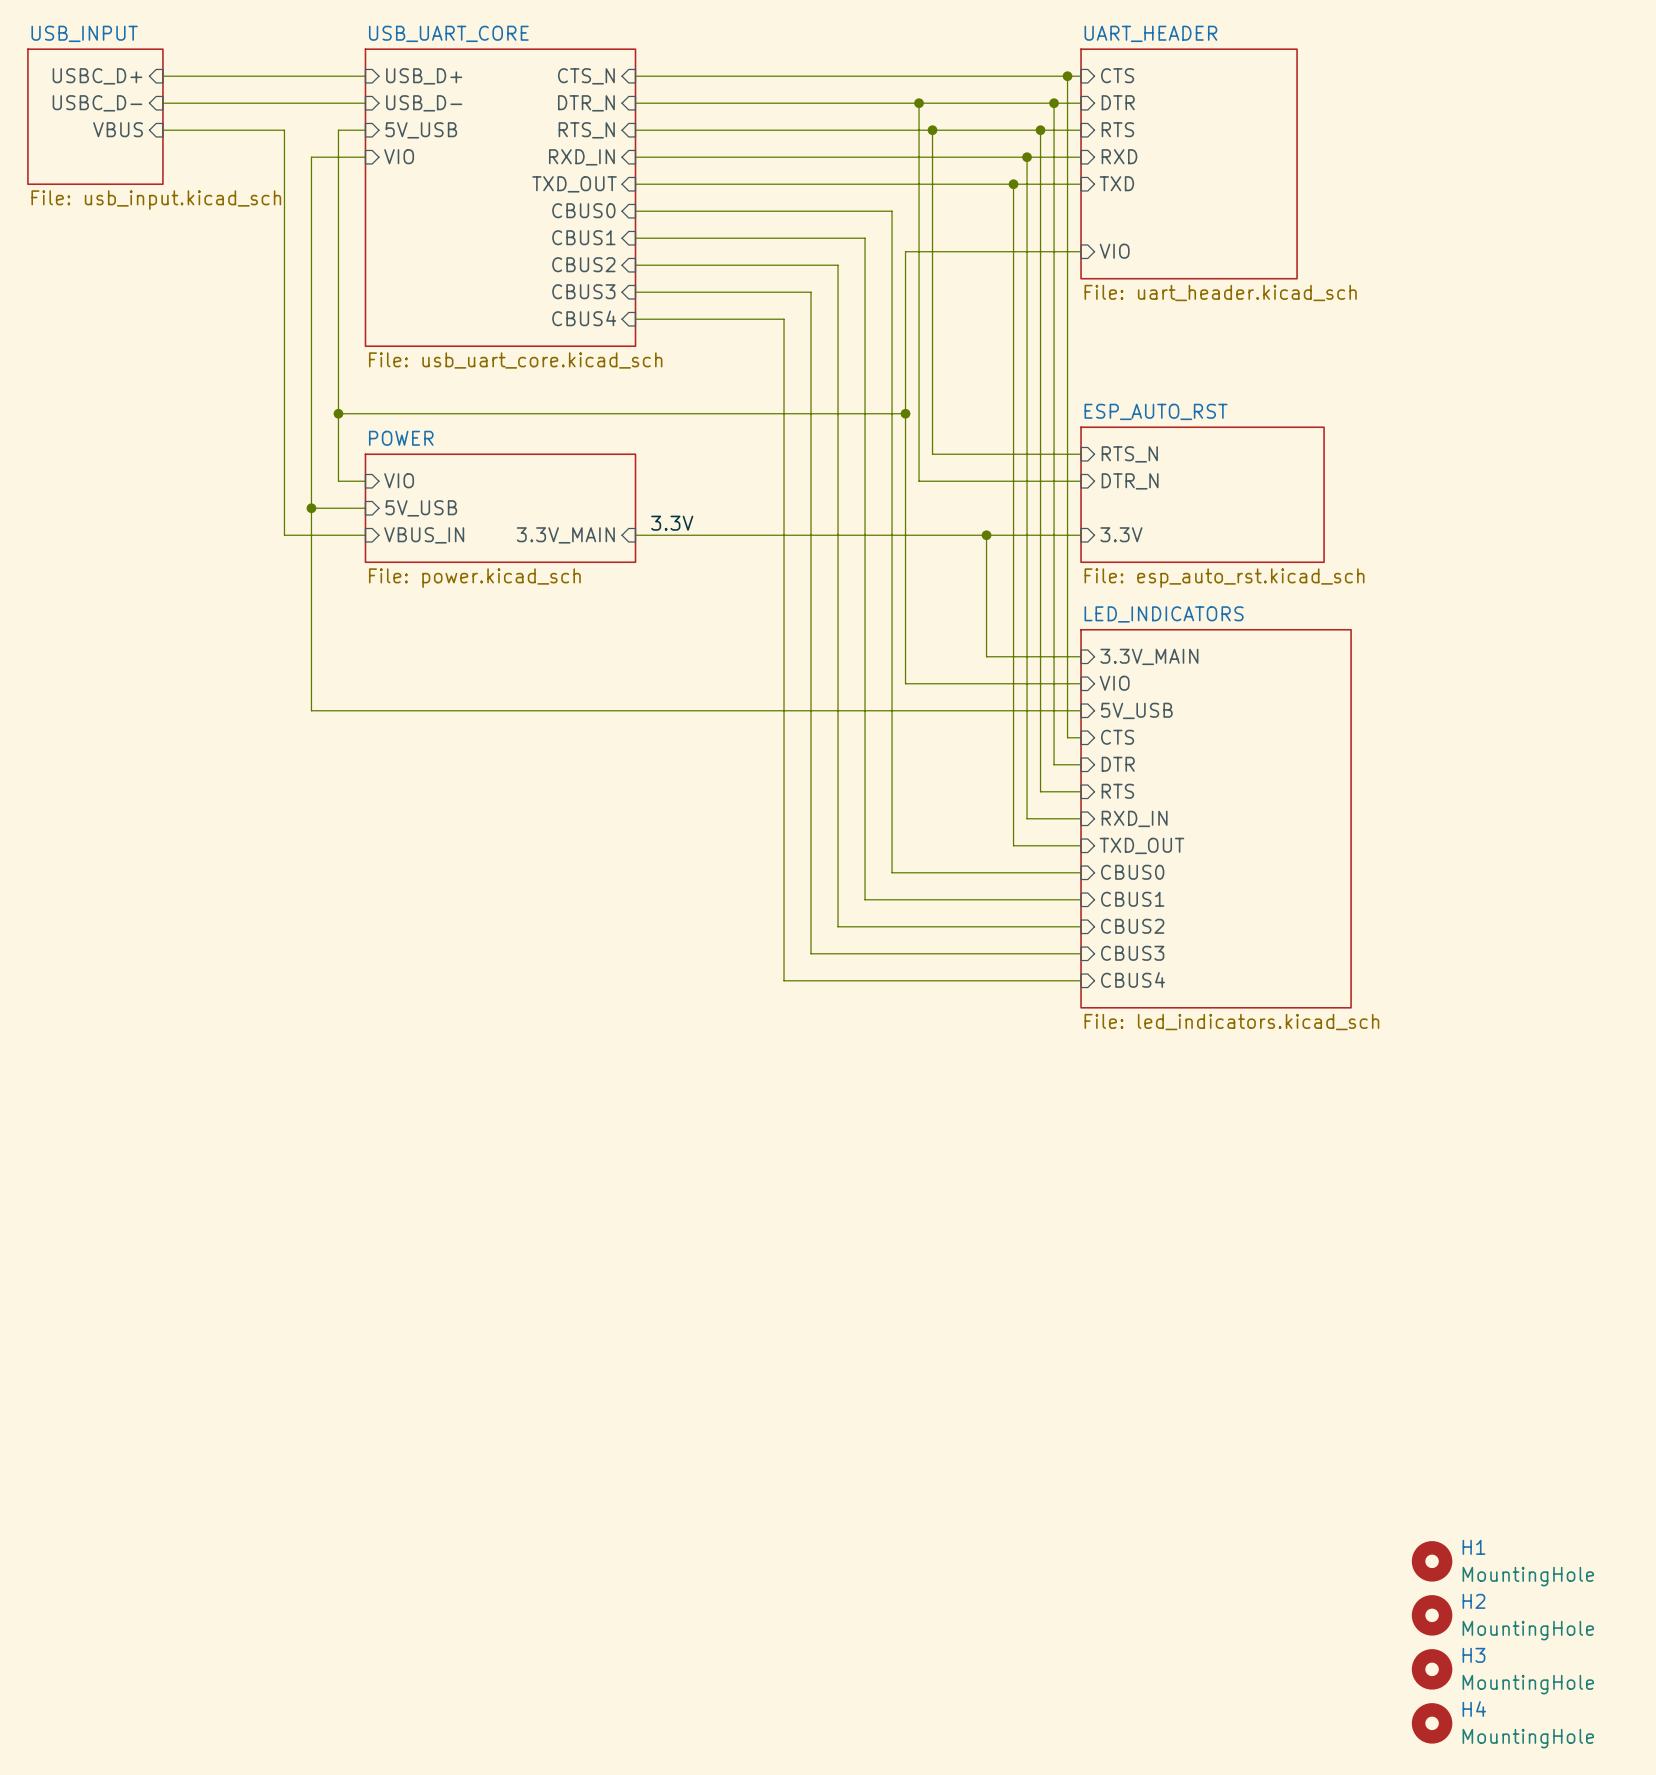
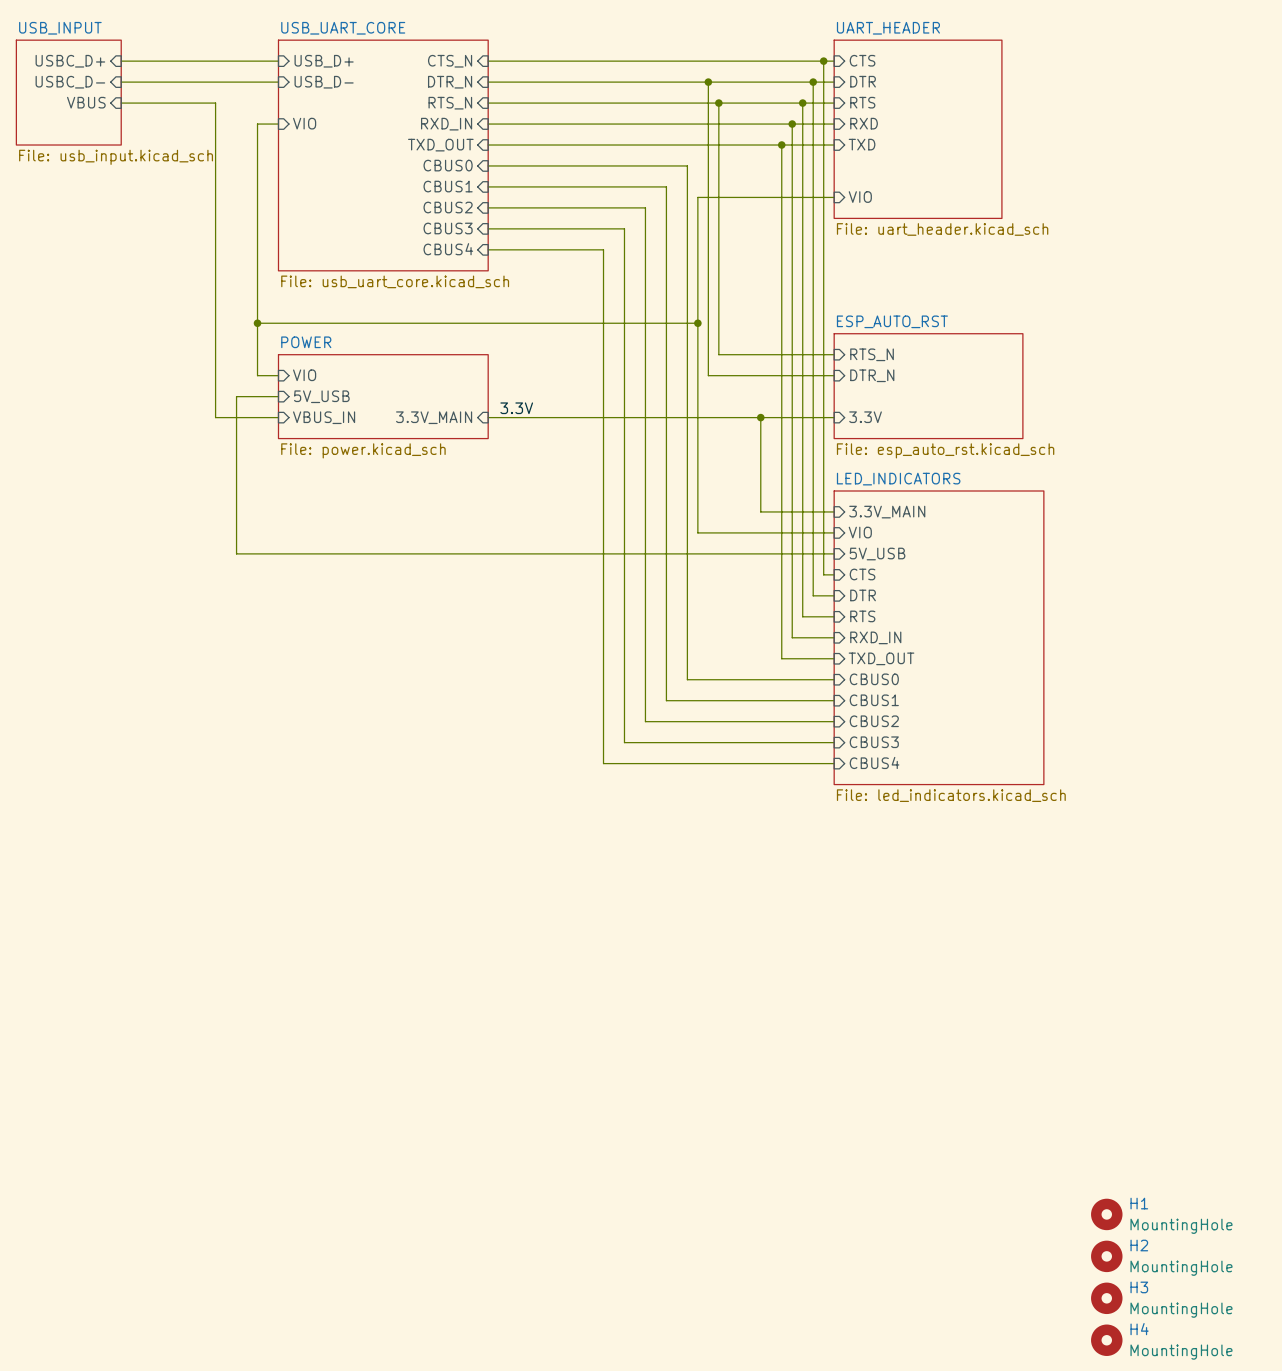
wire: (365, 130) (338, 130) (338, 157) (311, 157) (311, 508) -> none
sheet pin: 5V_USB (421, 130) -> none
junction: (311, 508) -> none

